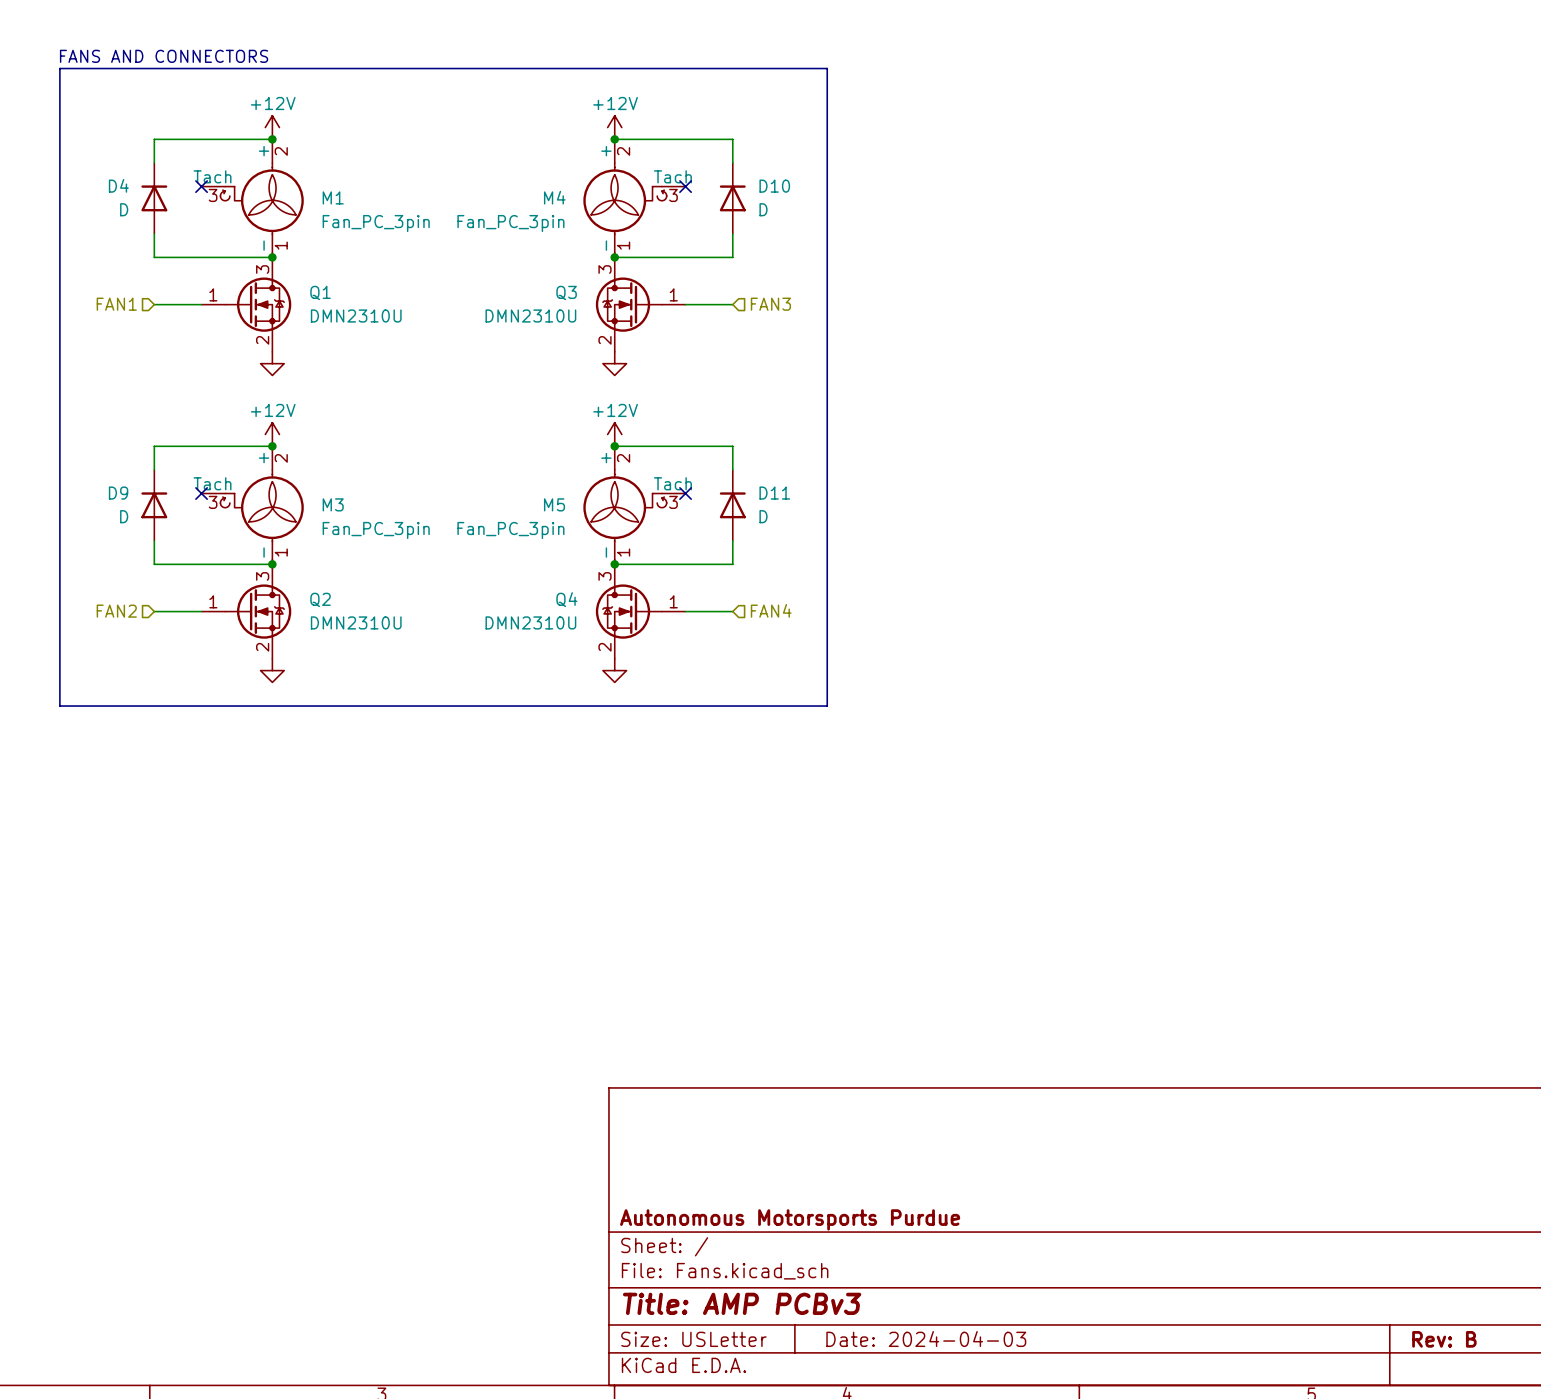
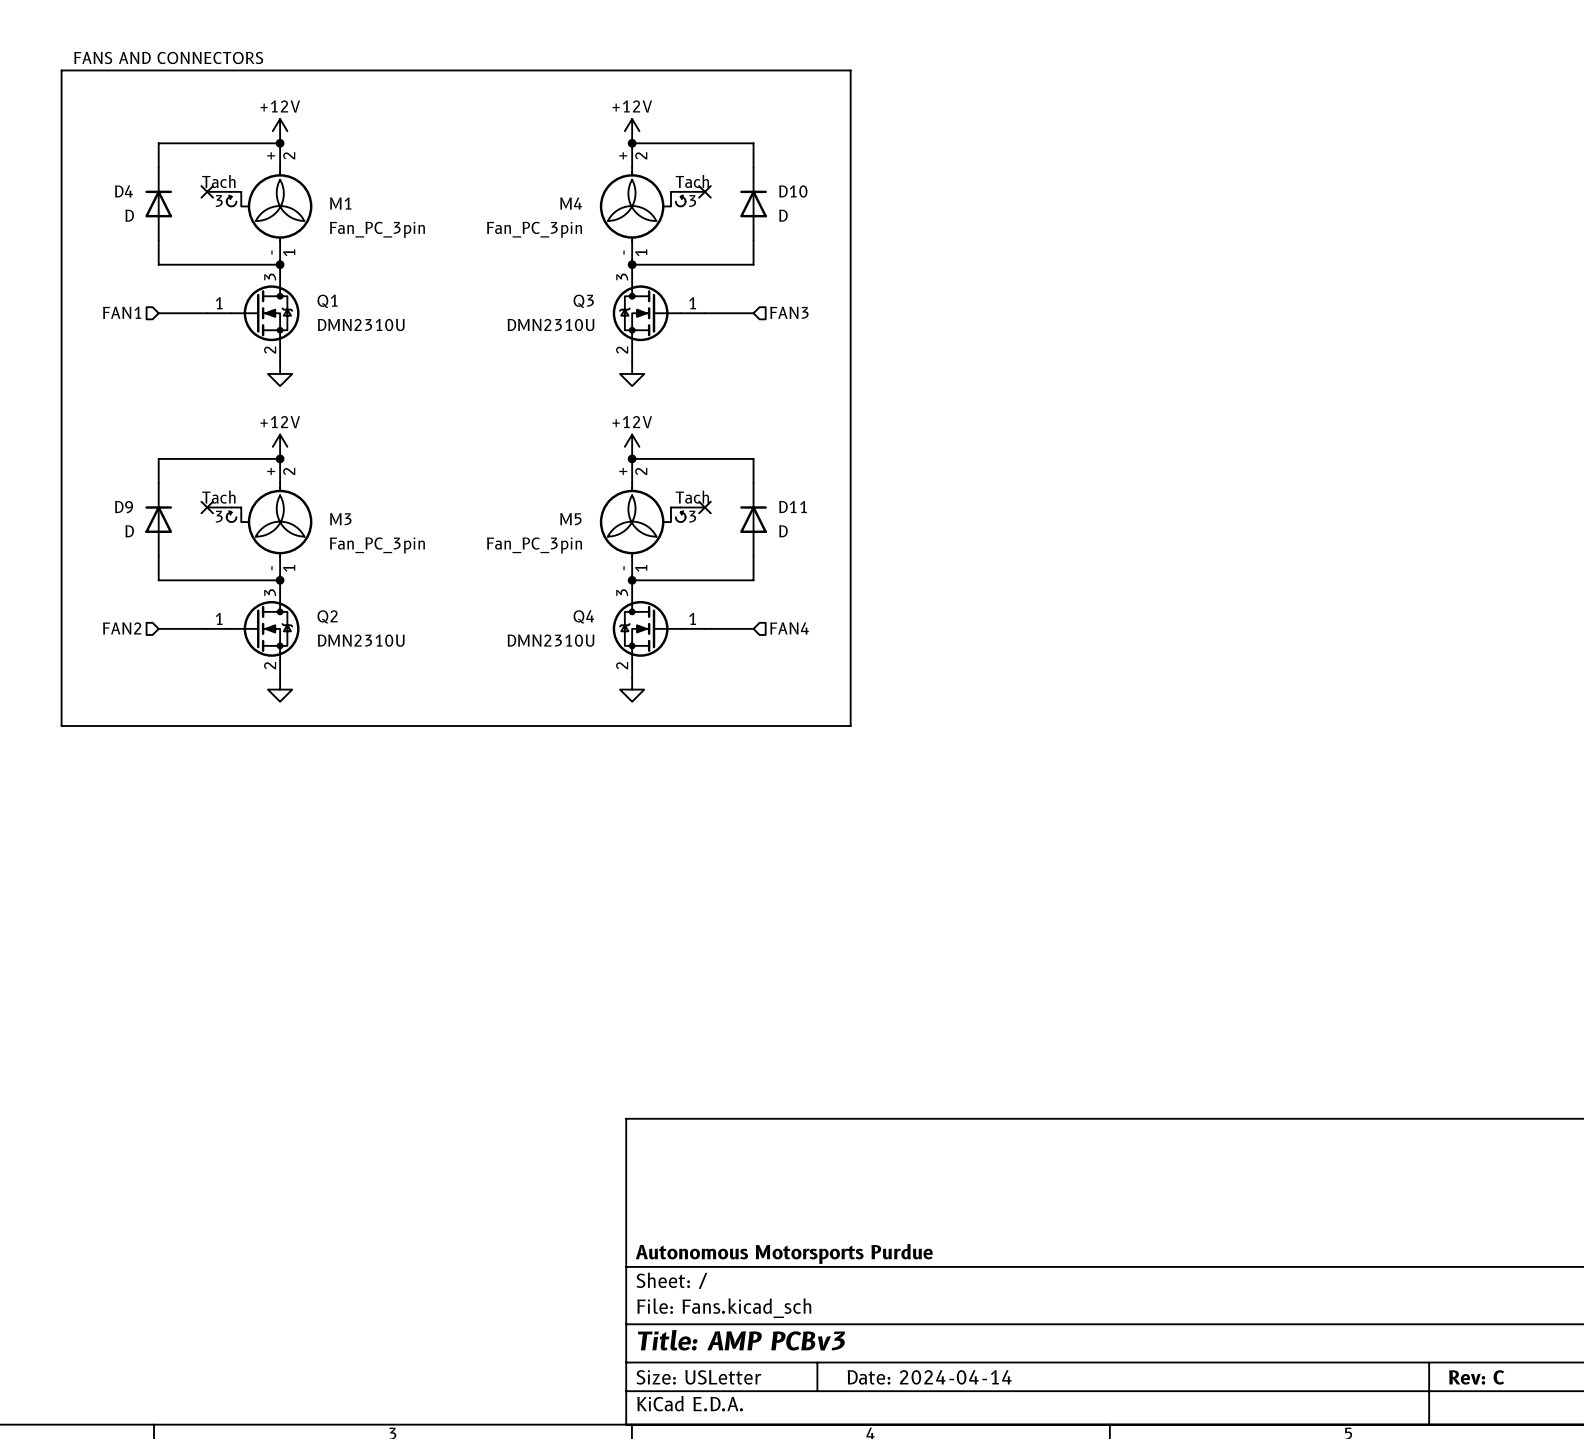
title block: Date: 2024-04-03 (926, 1339) -> Date: 2024-04-14 (929, 1377)
title block: Rev: B (1444, 1339) -> Rev: C (1476, 1377)

